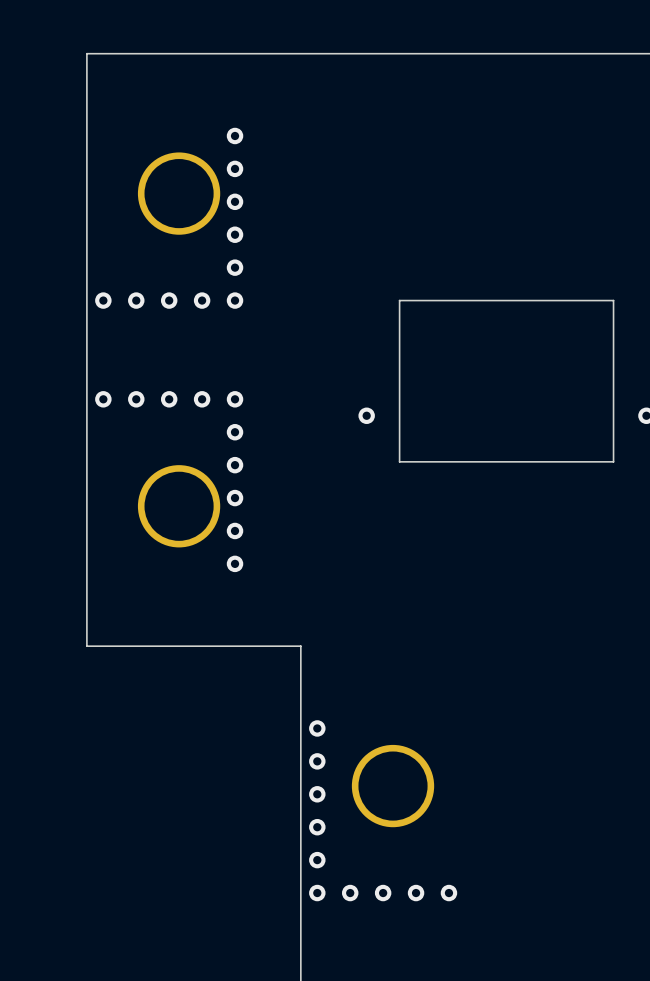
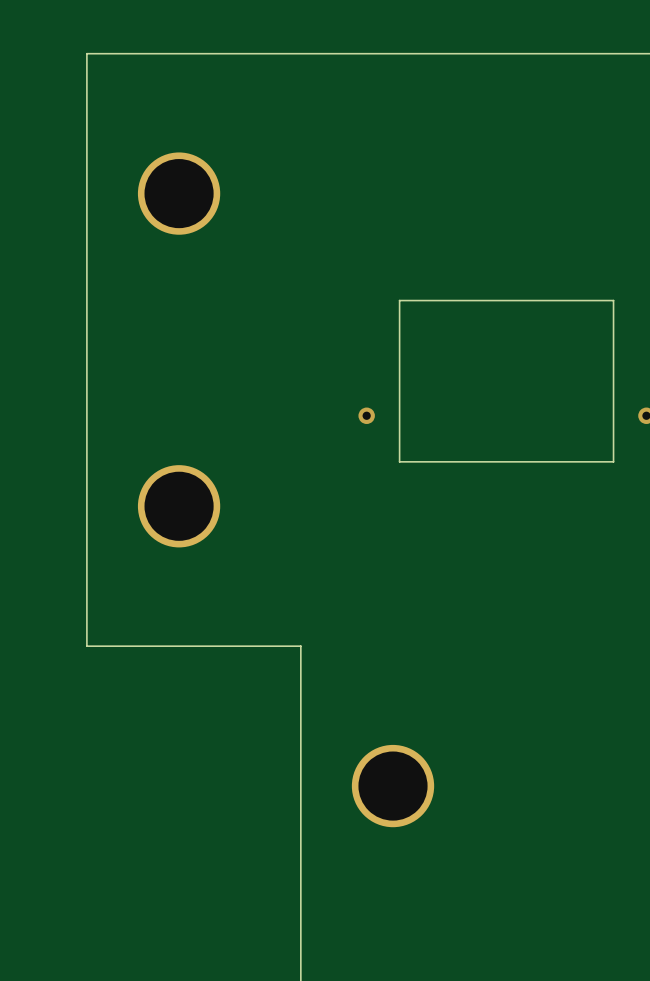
via: (235, 135) -> none
via: (235, 168) -> none
via: (235, 201) -> none
via: (235, 234) -> none
via: (235, 267) -> none
via: (103, 300) -> none
via: (136, 300) -> none
via: (169, 300) -> none
via: (202, 300) -> none
via: (235, 300) -> none
via: (103, 399) -> none
via: (136, 399) -> none
via: (169, 399) -> none
via: (202, 399) -> none
via: (235, 399) -> none
via: (235, 432) -> none
via: (235, 465) -> none
via: (235, 498) -> none
via: (235, 530) -> none
via: (235, 563) -> none
via: (317, 728) -> none
via: (317, 761) -> none
via: (317, 794) -> none
via: (317, 827) -> none
via: (317, 860) -> none
via: (317, 893) -> none
via: (350, 893) -> none
via: (383, 893) -> none
via: (416, 893) -> none
via: (448, 893) -> none

